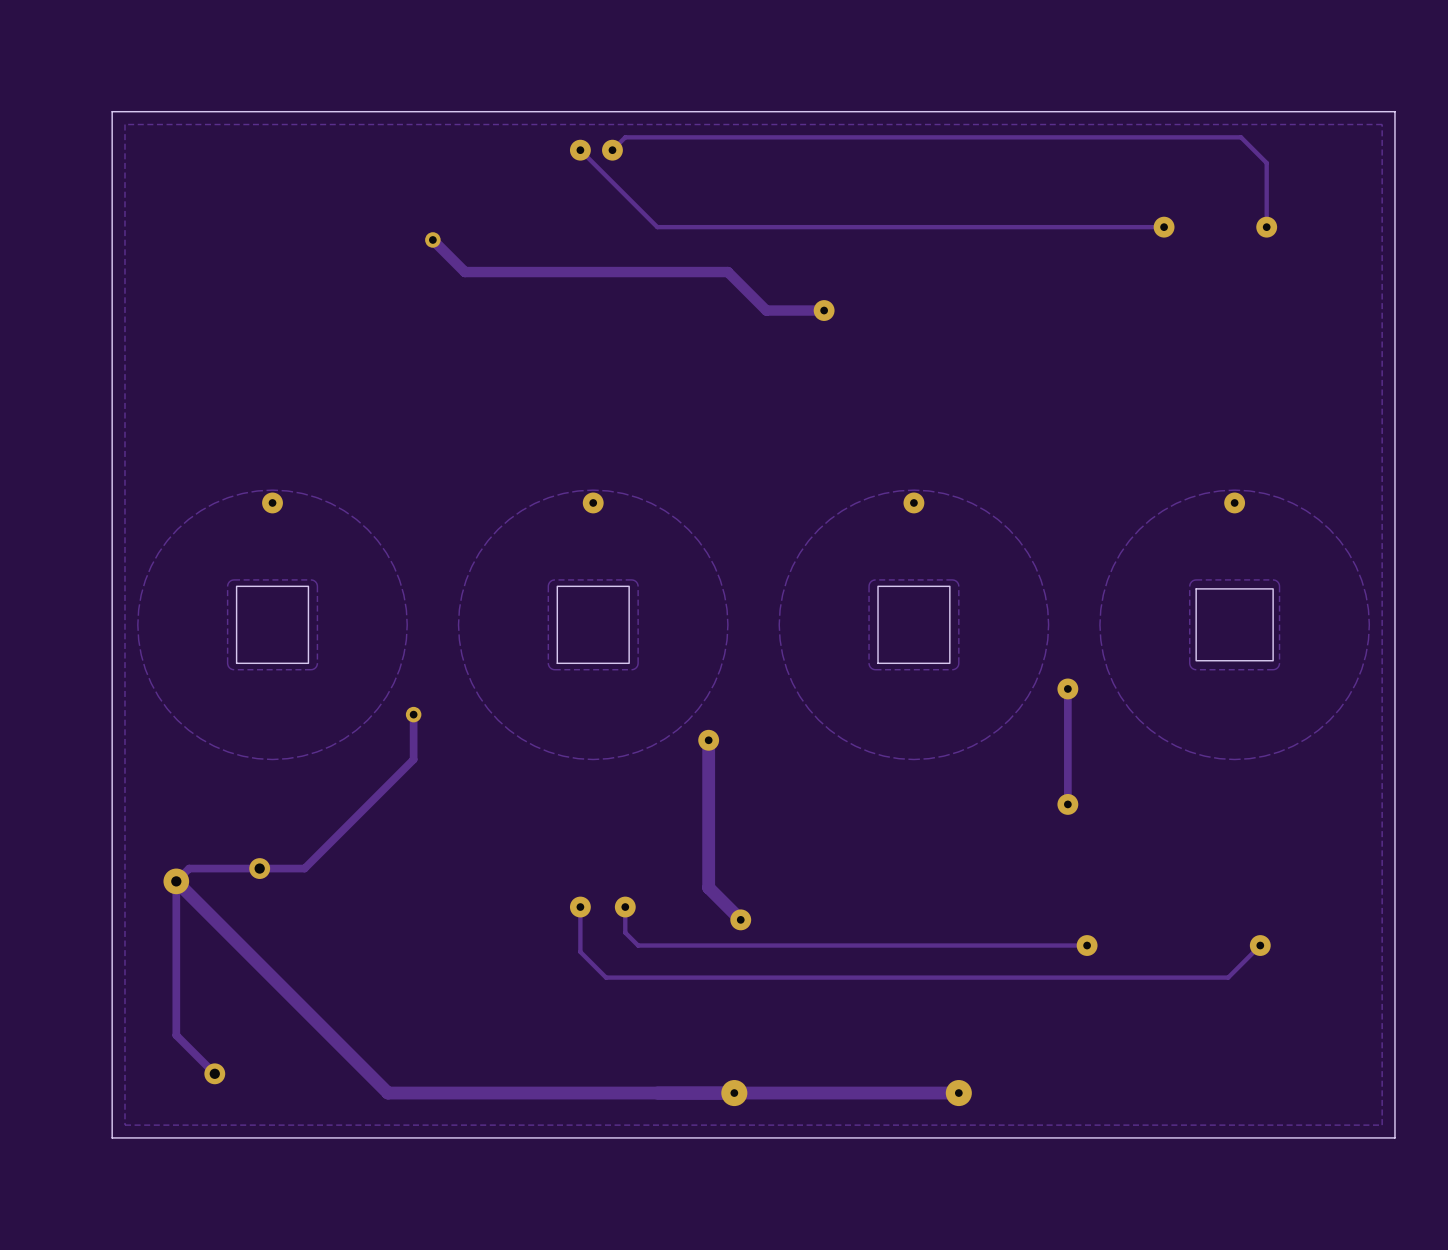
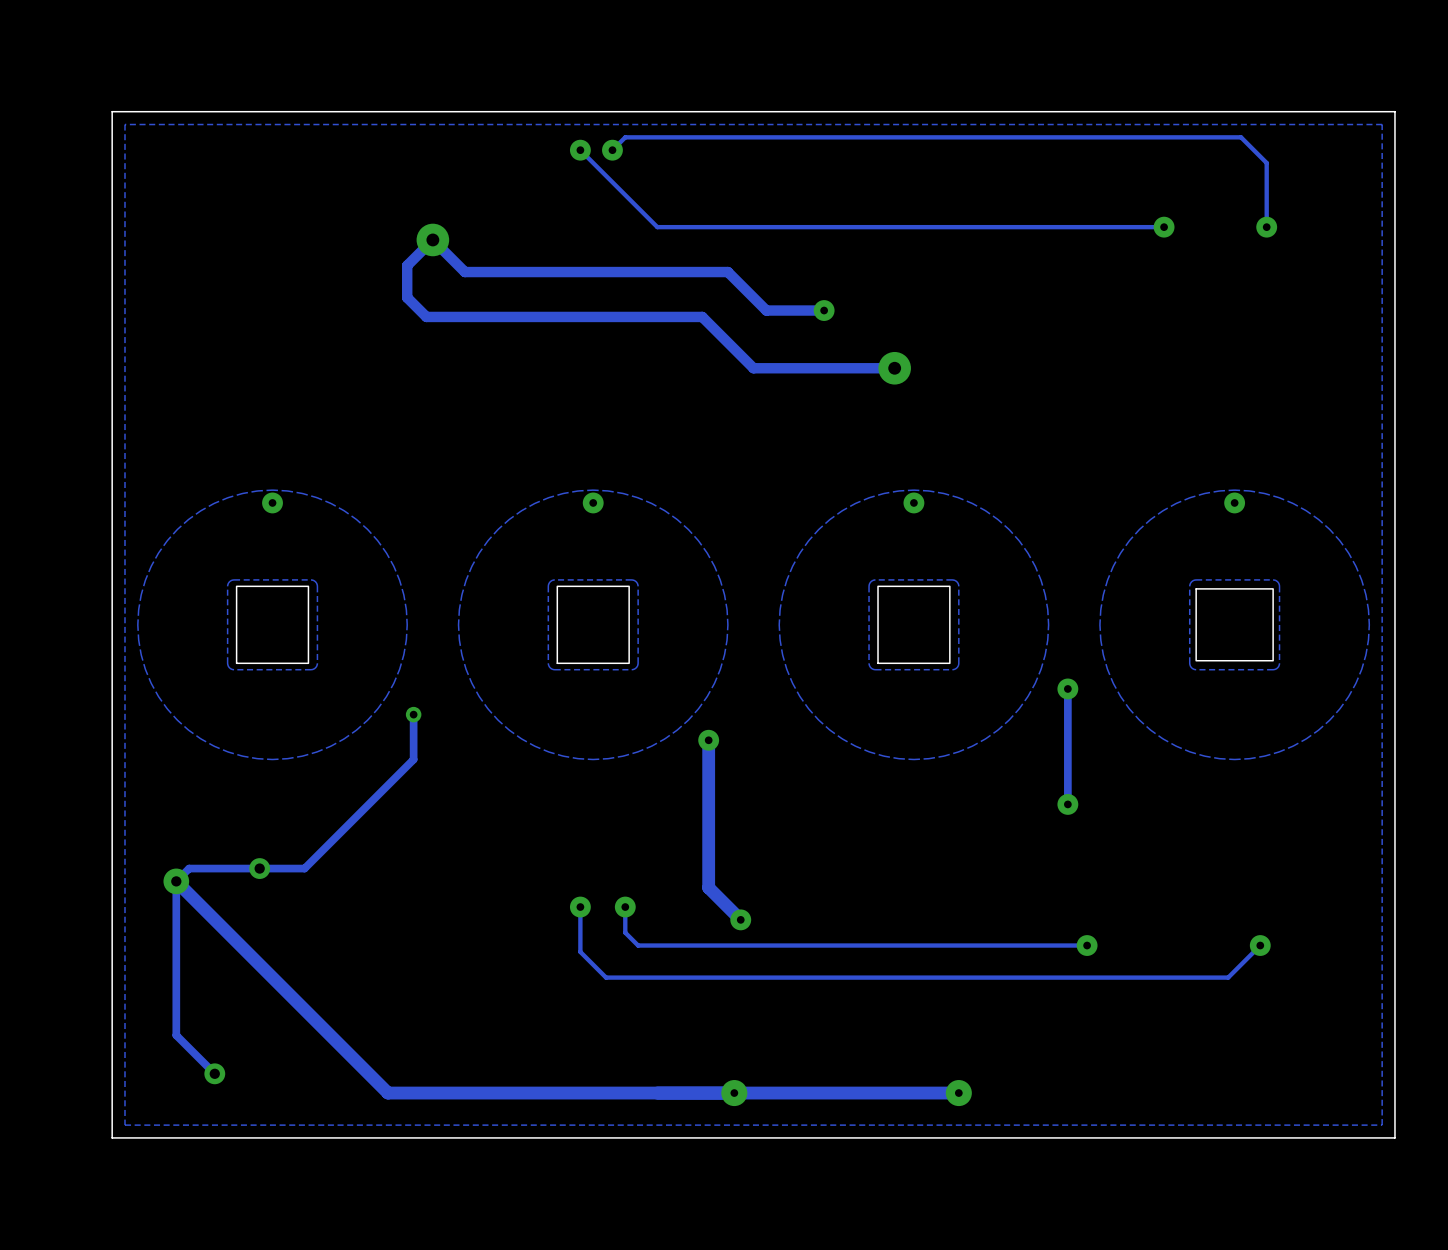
via size: [425, 232, 441, 248] -> [416, 223, 450, 257]
track: none -> (432, 239) (407, 265) (407, 297) (426, 316) (702, 316) (753, 368) (894, 368)
via: none -> (894, 368)

